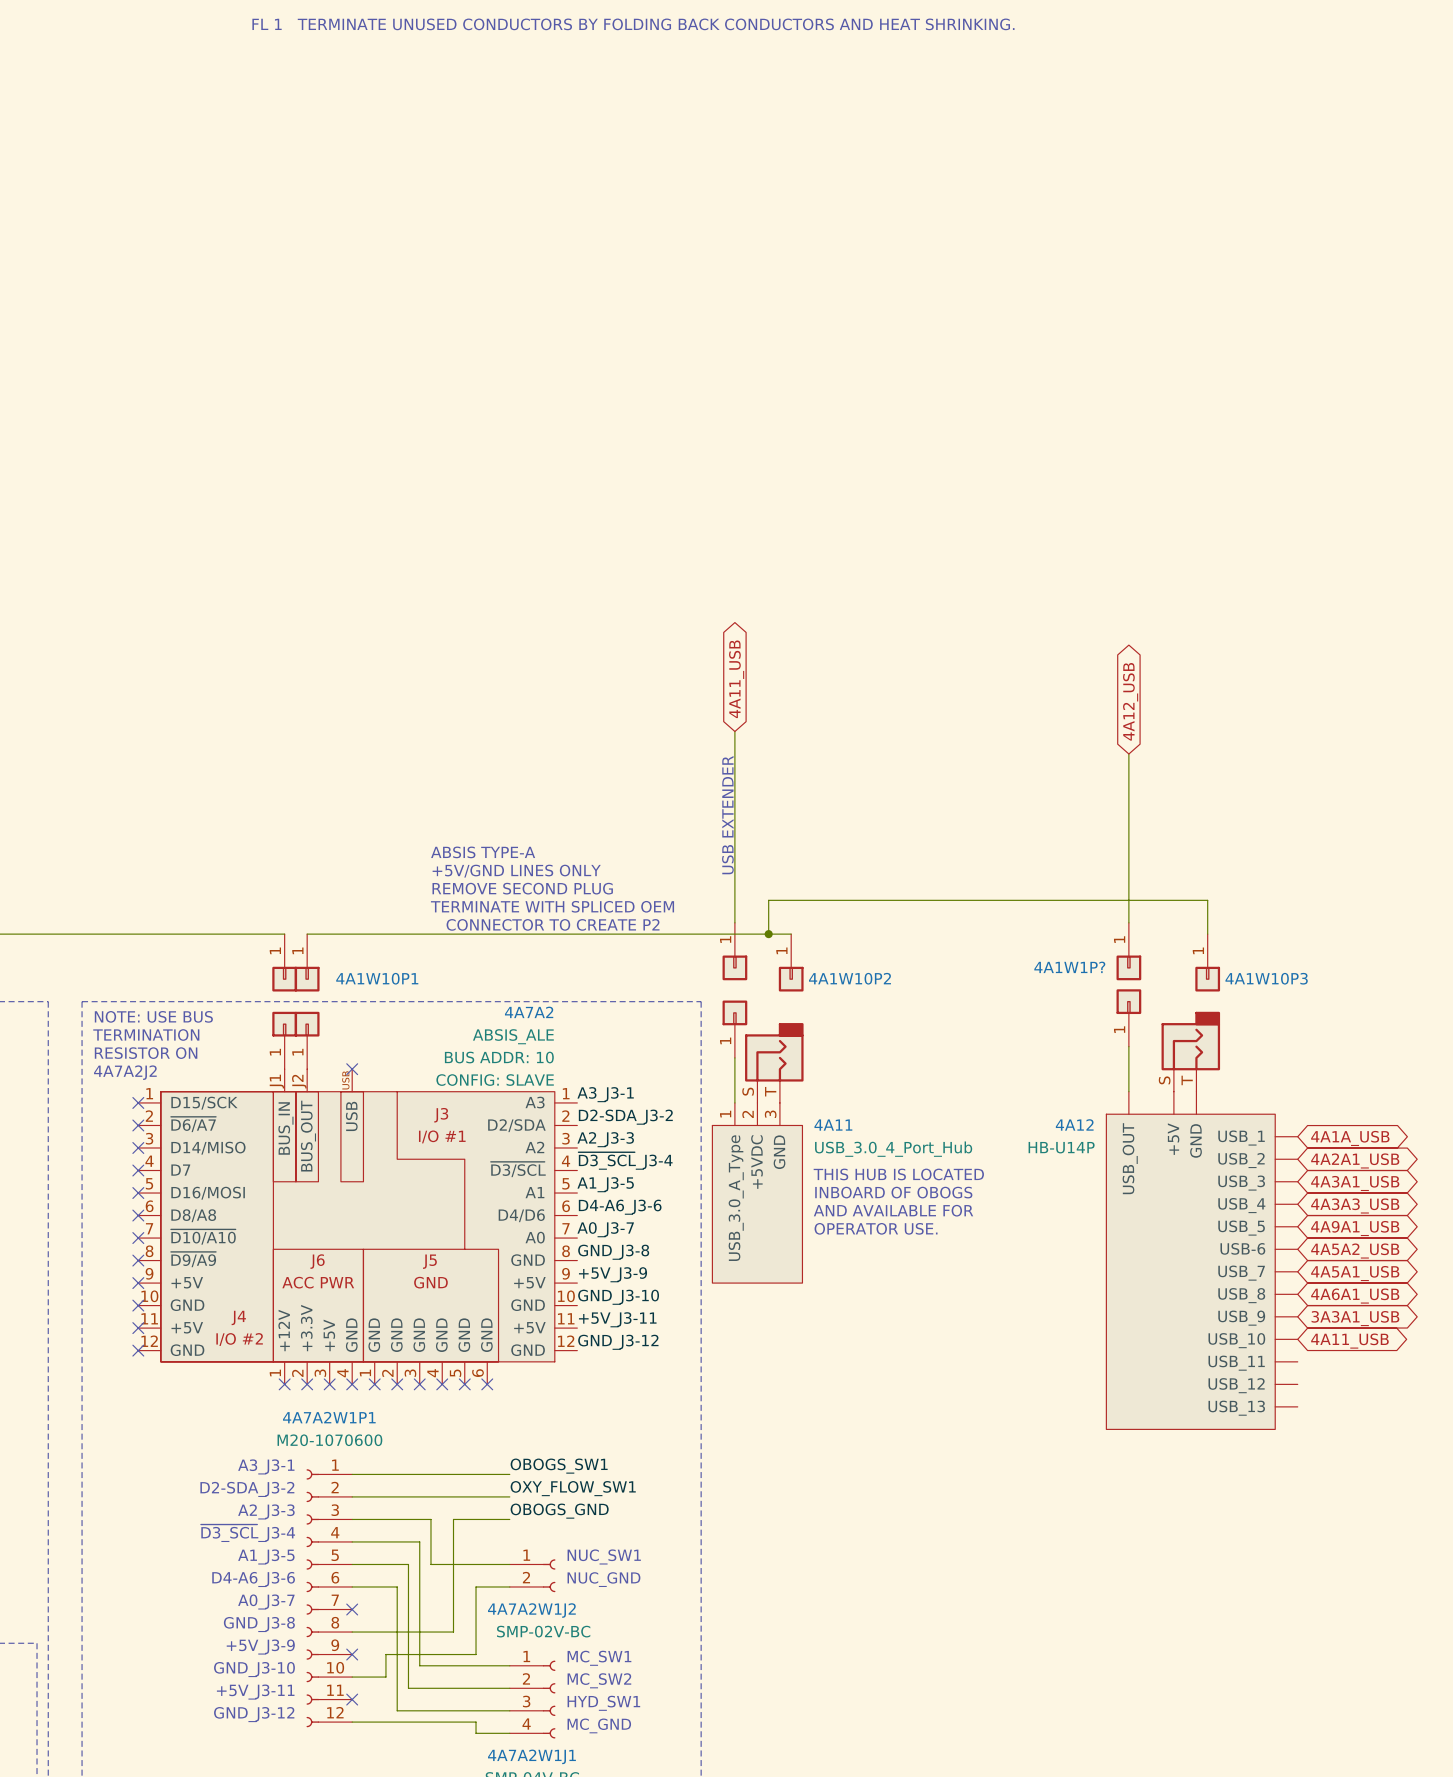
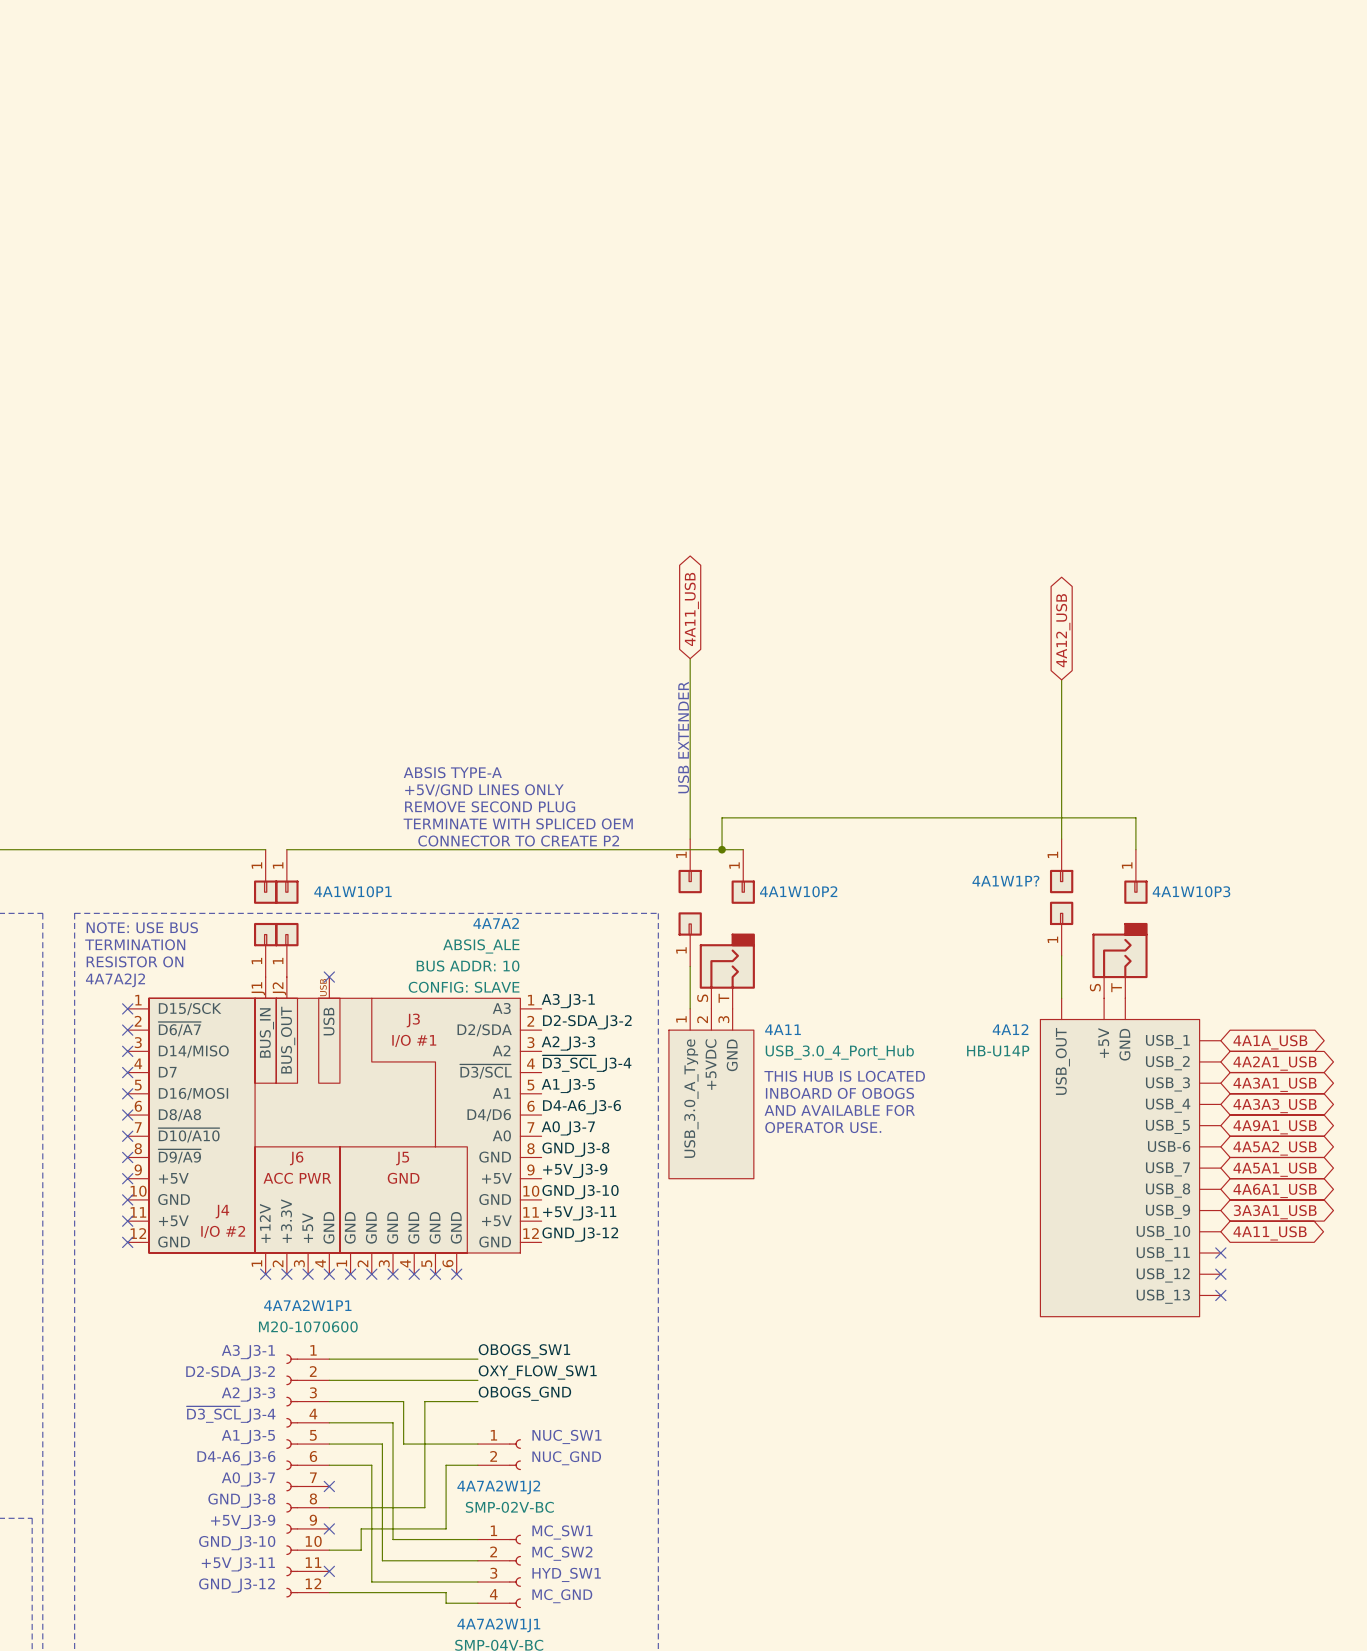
no-connect mark: none -> (1220, 1253)
no-connect mark: none -> (1220, 1274)
no-connect mark: none -> (1220, 1295)

